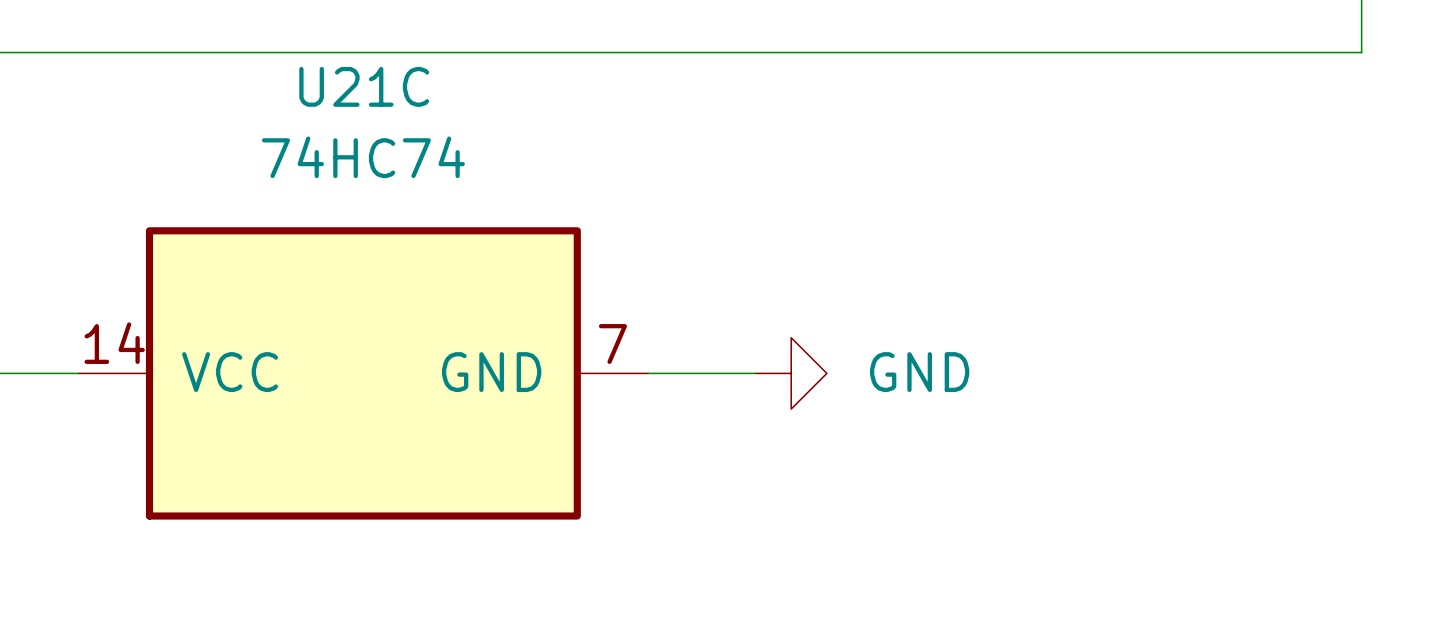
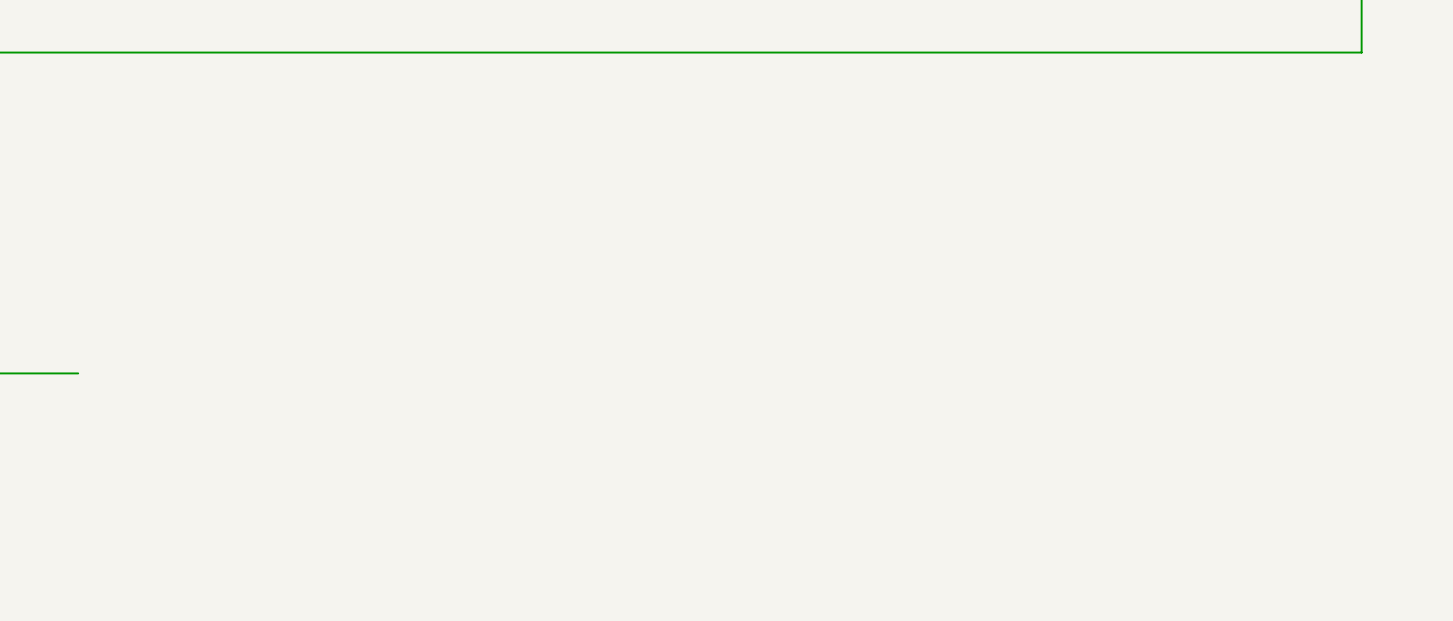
U21C: 74HC74 (363, 373) -> none
wire: (648, 373) (755, 373) -> none
power symbol: GND (791, 373) -> none

